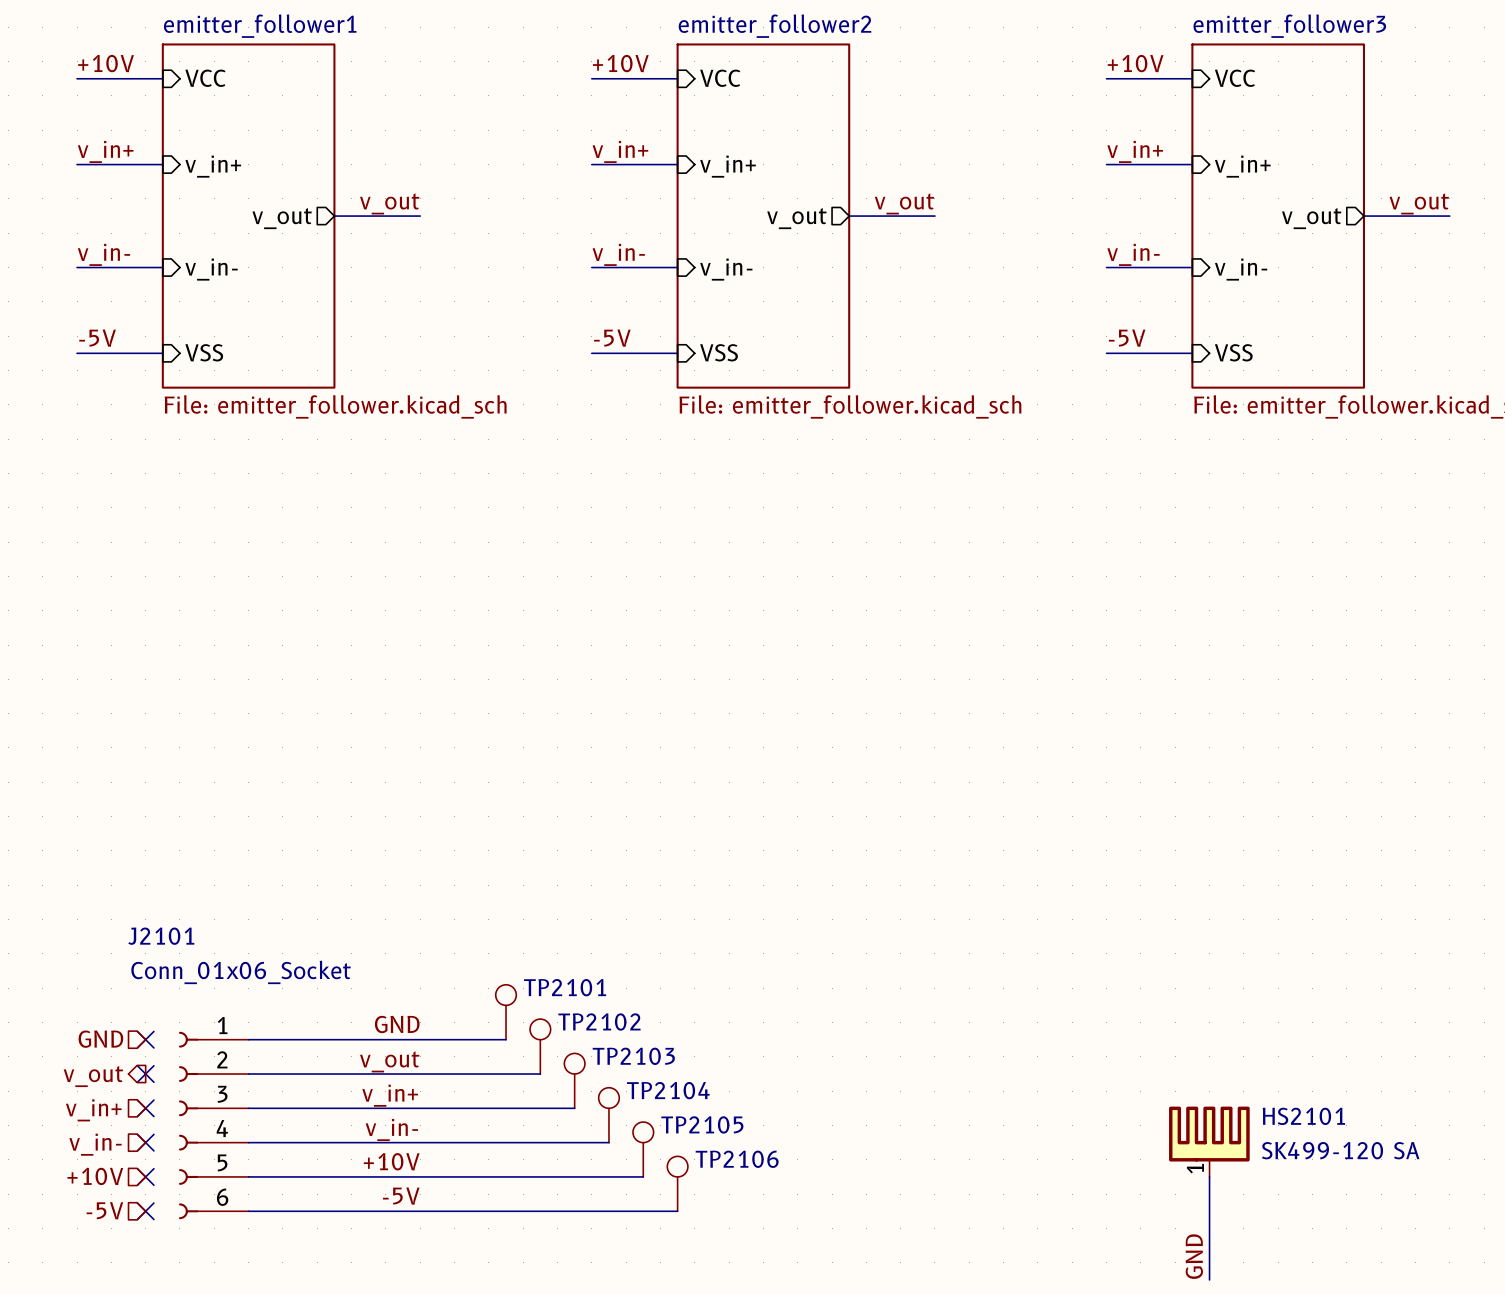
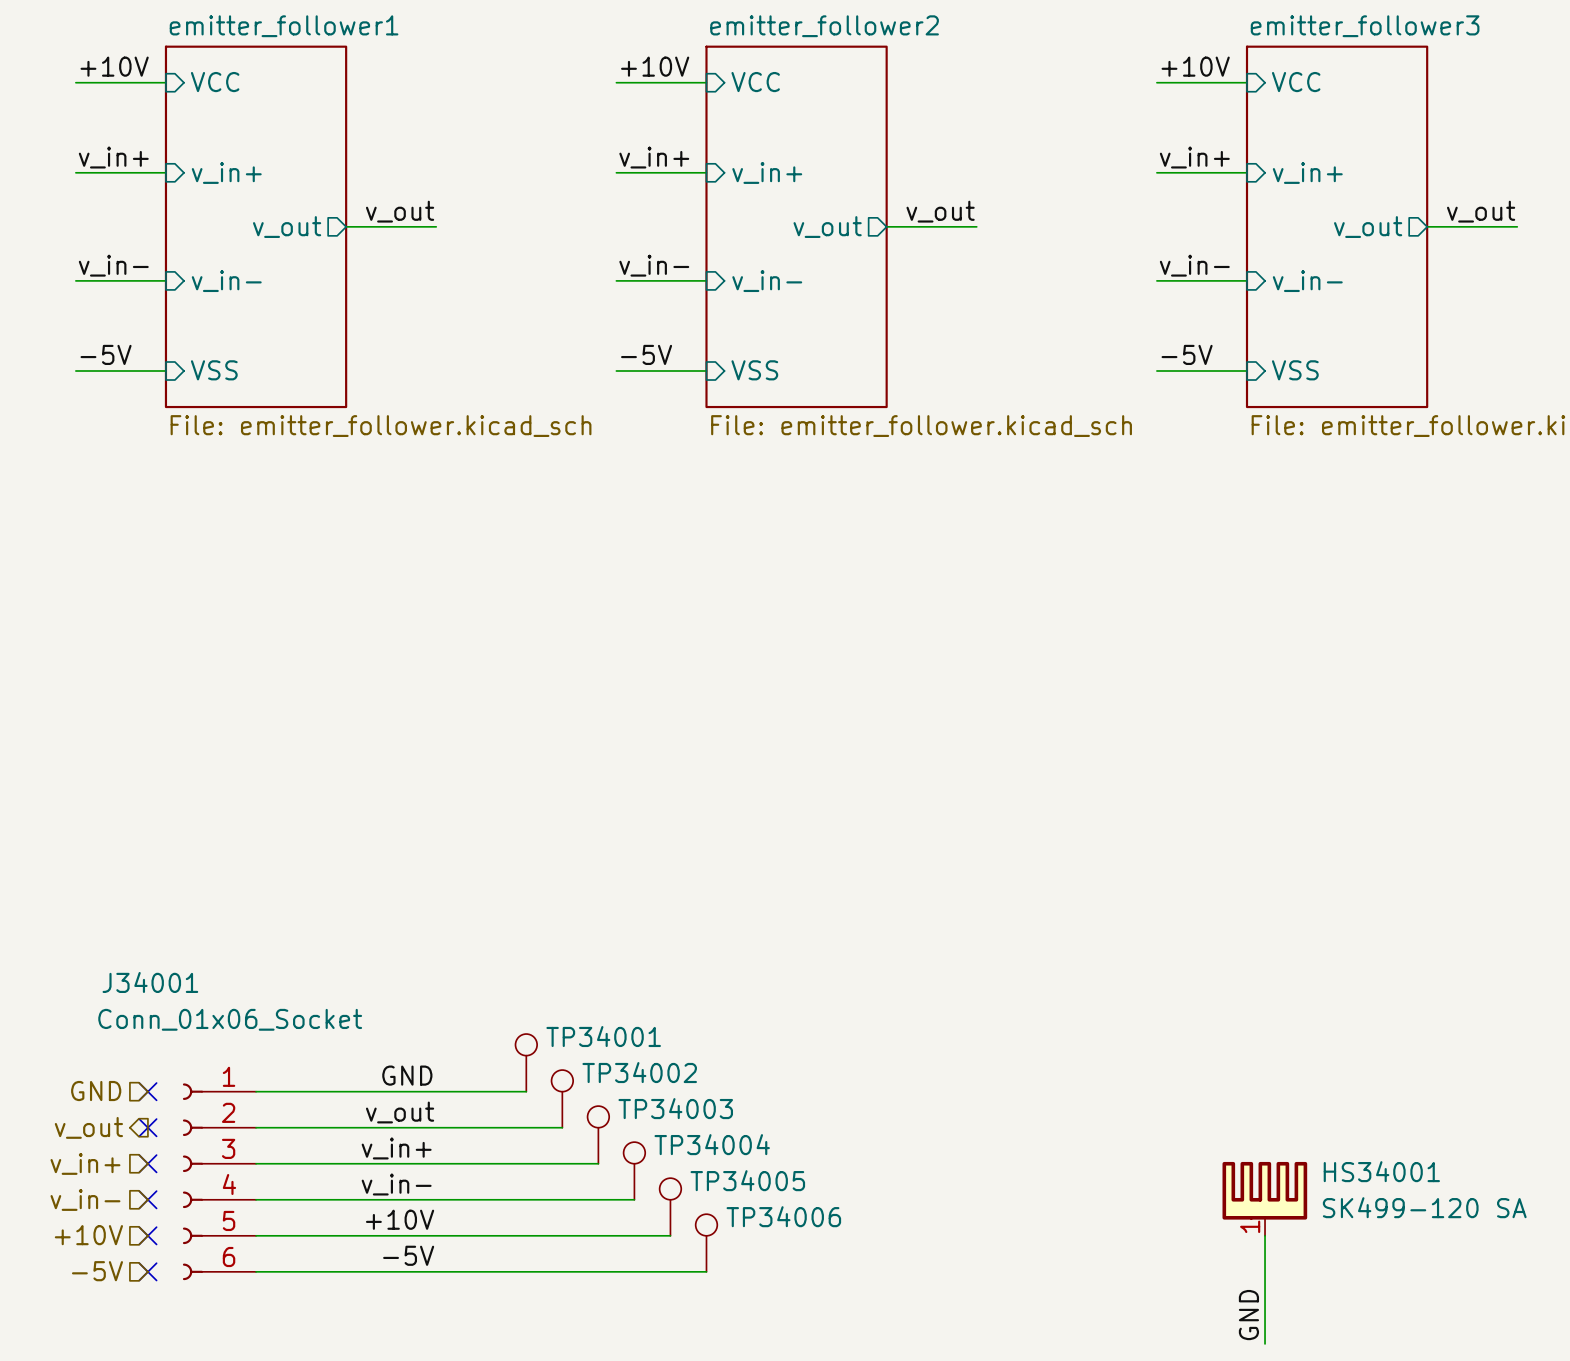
J2101 name: J2101 (161, 936) -> J34001 (150, 982)
TP2101 name: TP2101 (565, 987) -> TP34001 (603, 1036)
TP2102 name: TP2102 (599, 1021) -> TP34002 (639, 1072)
TP2103 name: TP2103 (633, 1056) -> TP34003 (675, 1108)
TP2104 name: TP2104 (668, 1090) -> TP34004 (712, 1144)
HS2101 name: HS2101 (1303, 1116) -> HS34001 (1381, 1171)
TP2105 name: TP2105 (702, 1124) -> TP34005 (747, 1180)
TP2106 name: TP2106 (737, 1159) -> TP34006 (783, 1216)

